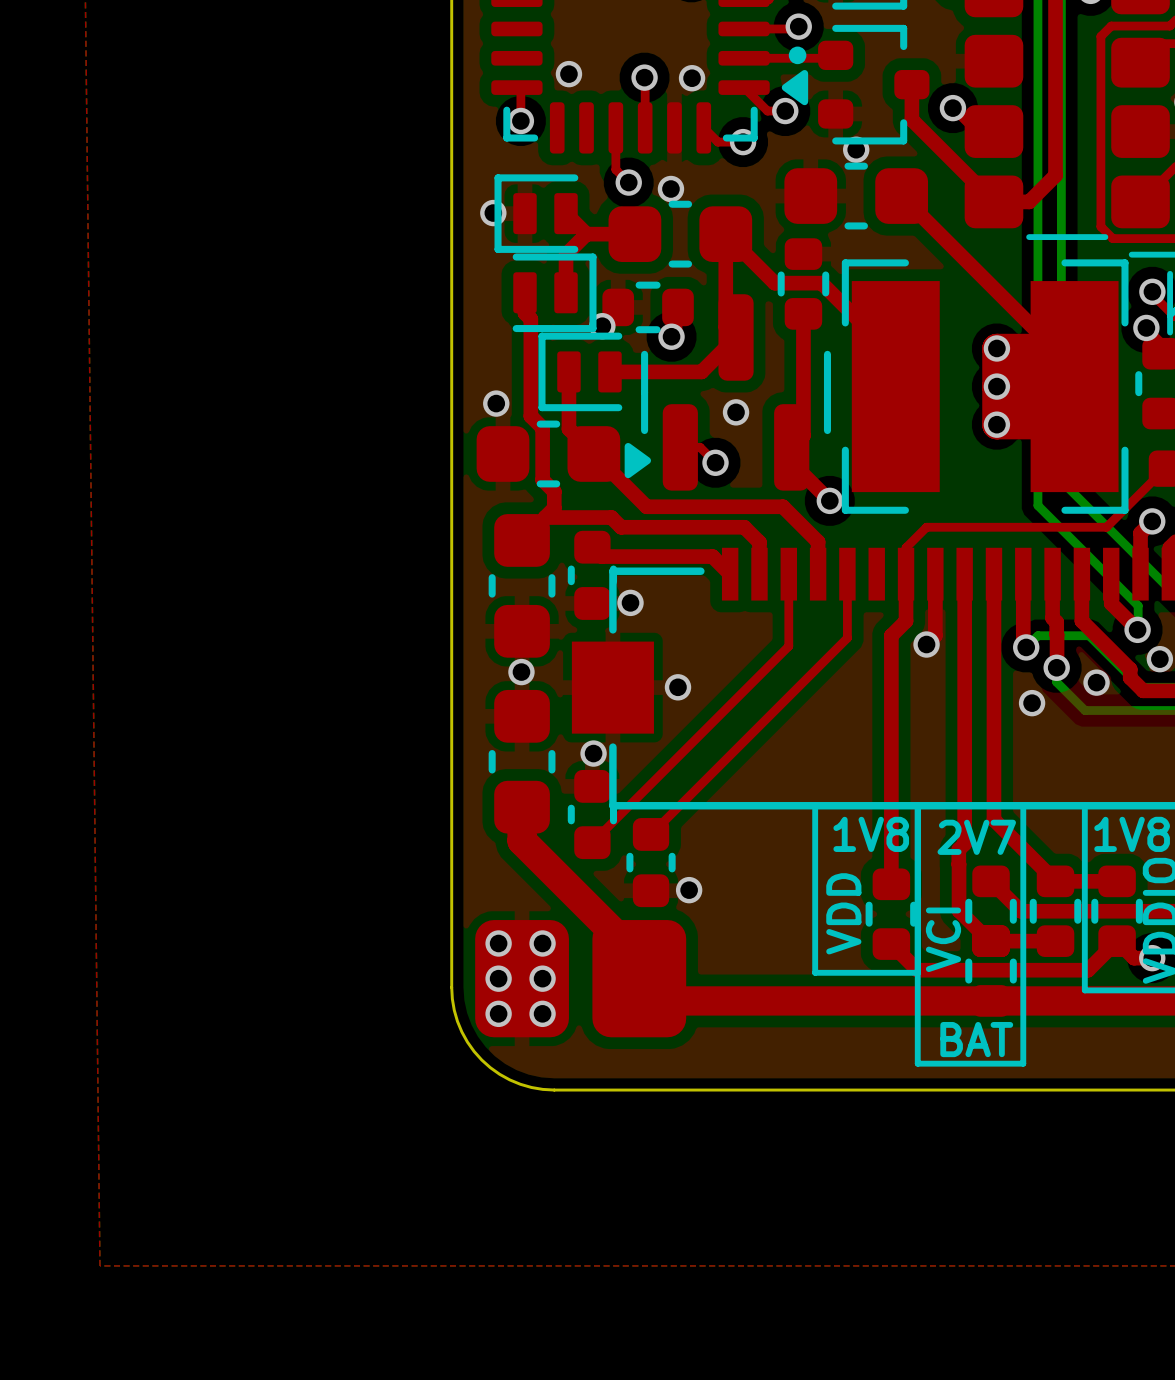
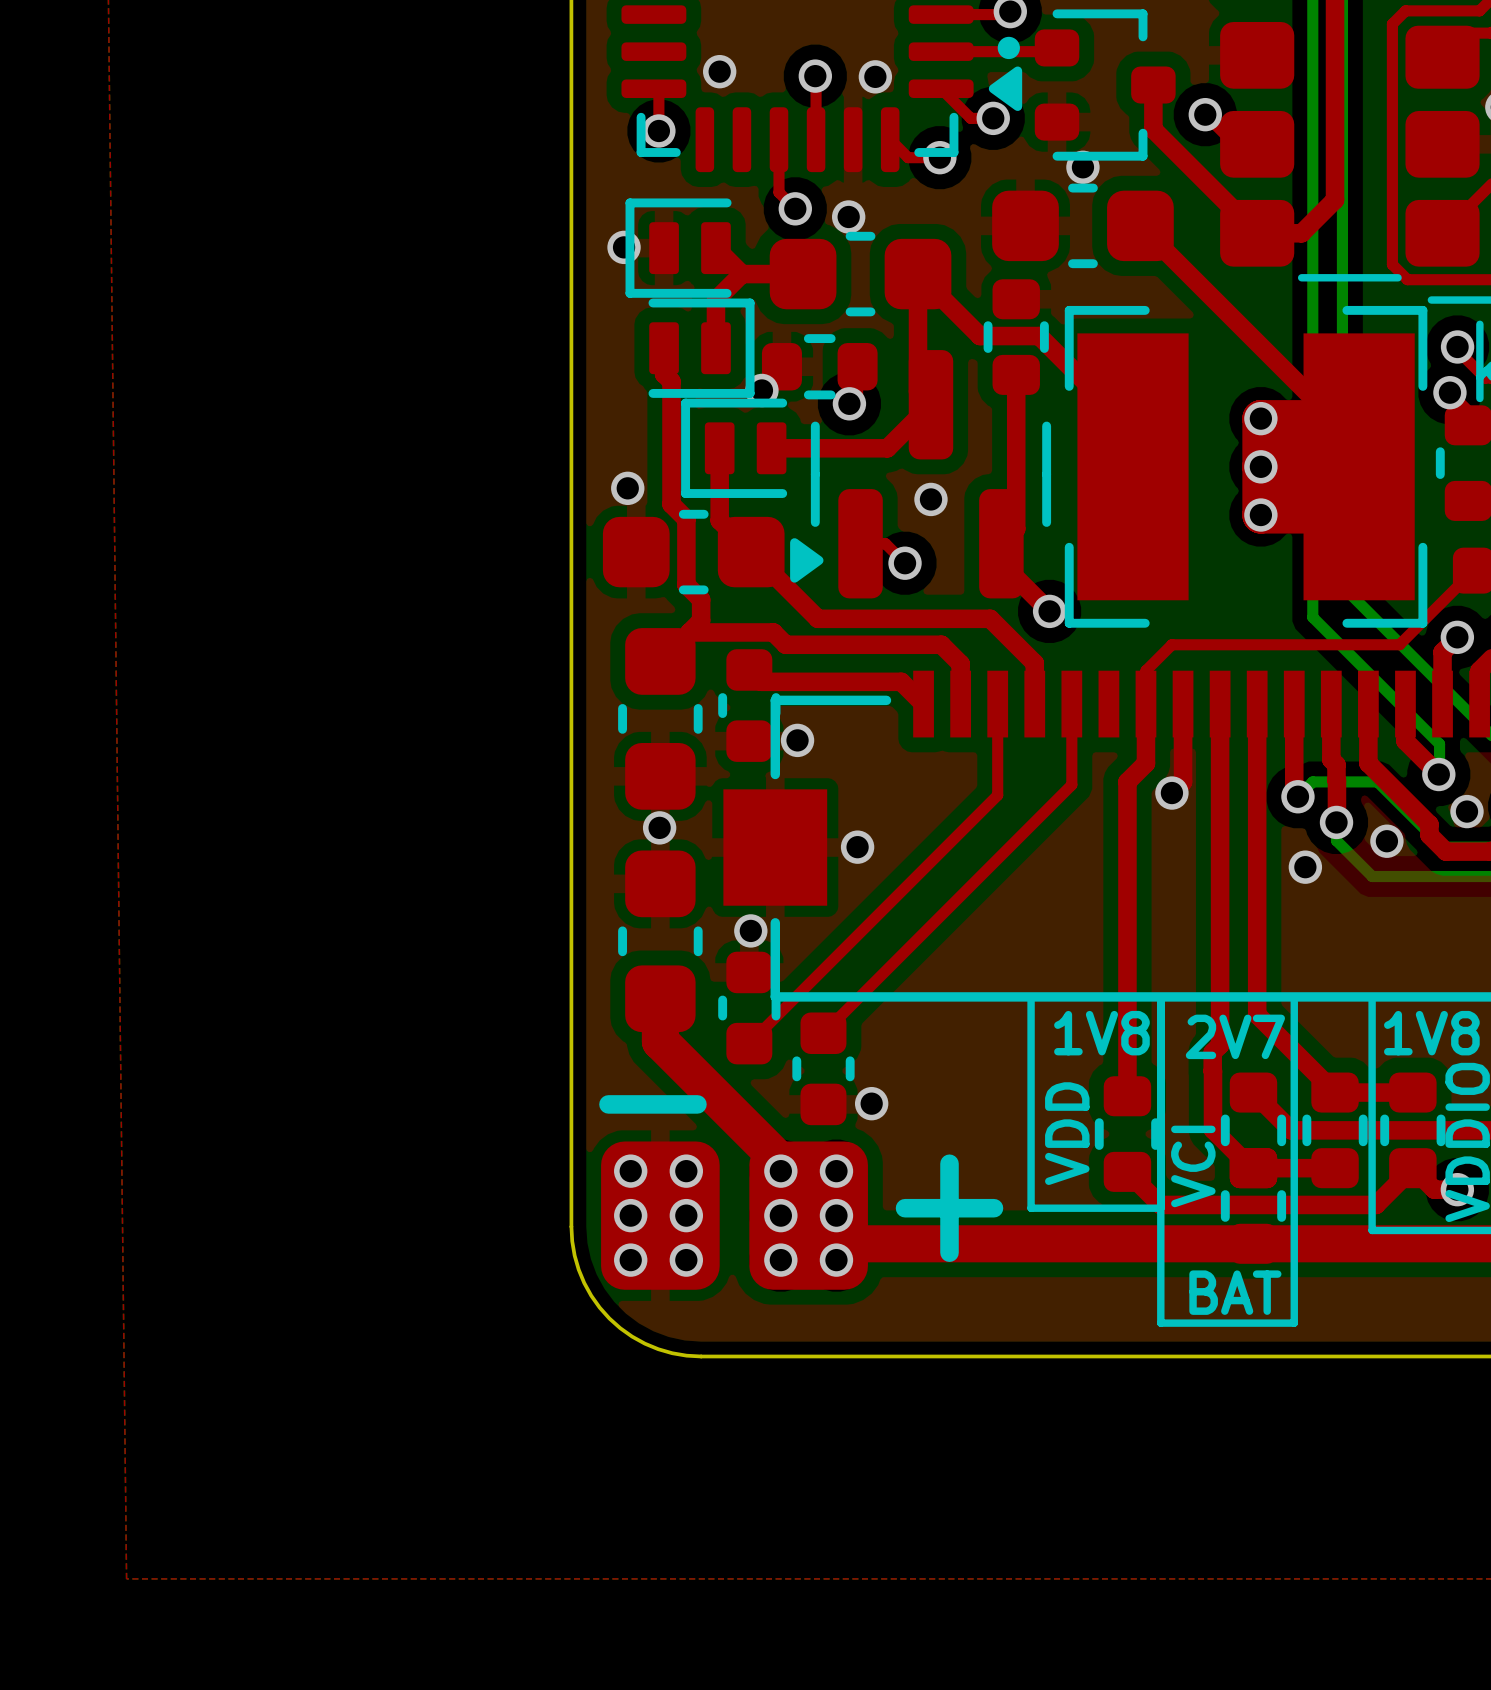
line: none -> (608, 1104) (697, 1104)
line: none -> (949, 1163) (949, 1252)
via: none -> (780, 1171)
via: none -> (836, 1171)
line: none -> (905, 1208) (993, 1208)
via: none -> (780, 1215)
via: none -> (836, 1215)
via: none -> (780, 1260)
via: none -> (836, 1260)

